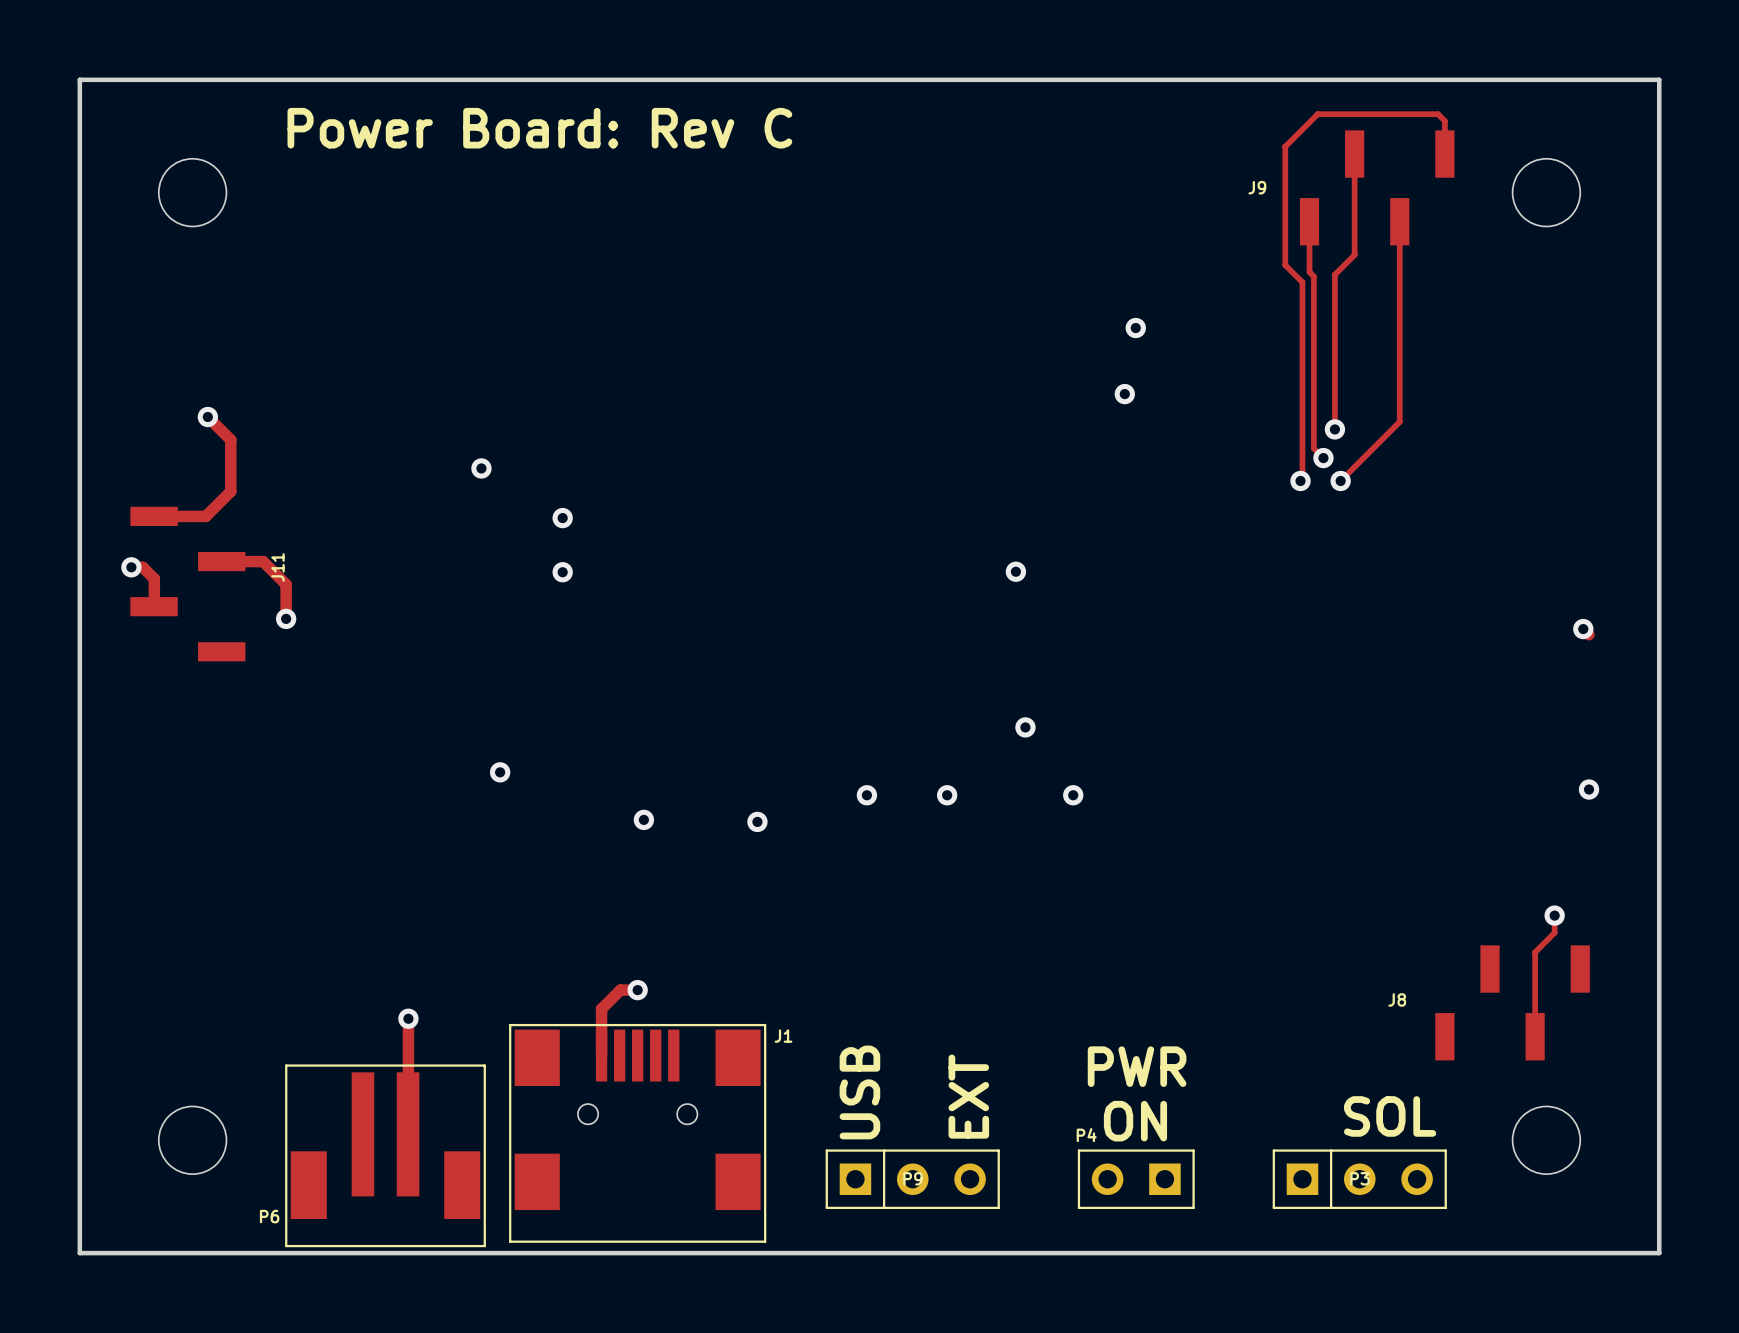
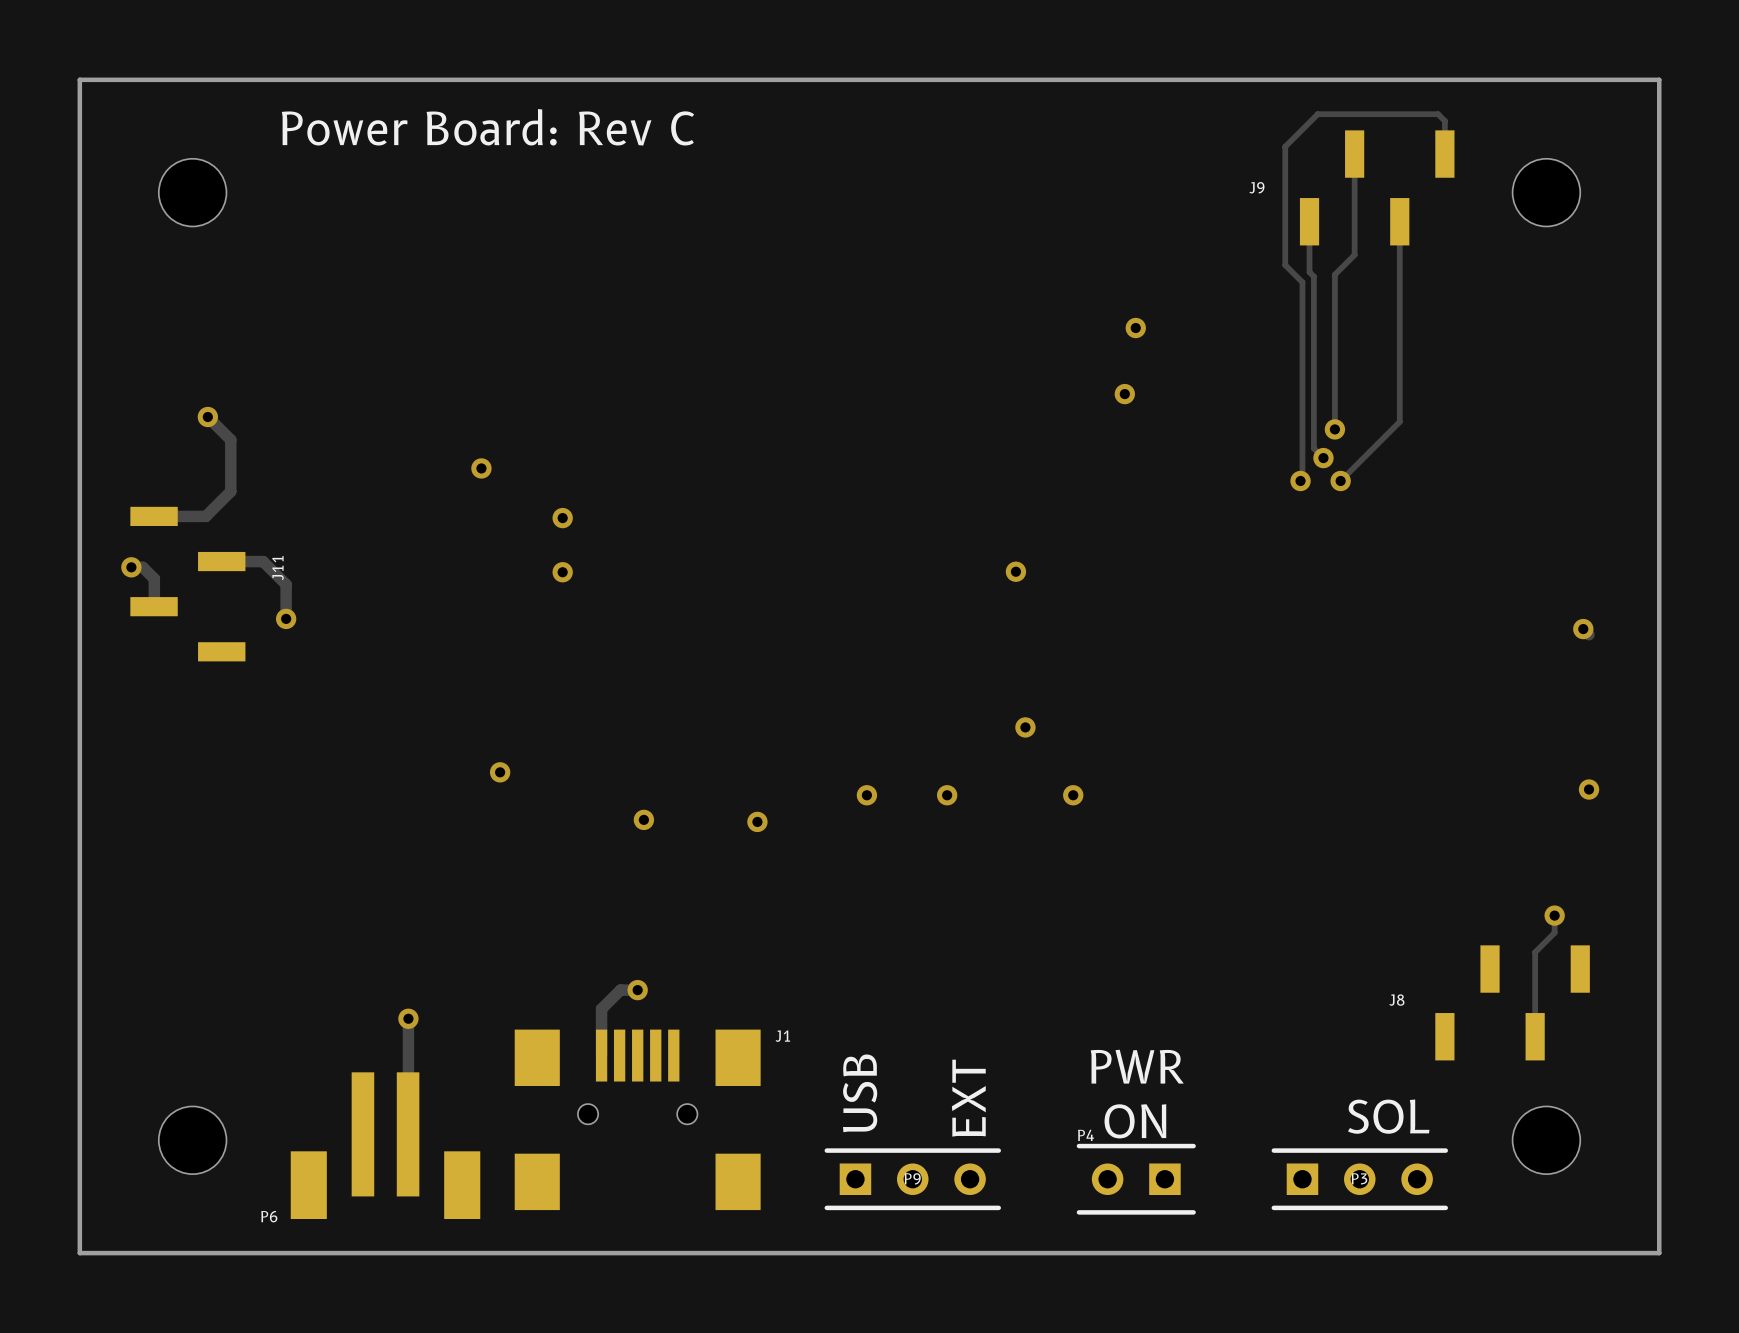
J1 footprint: [509, 1023, 767, 1243] -> [514, 1029, 761, 1211]
P6 footprint: [285, 1064, 486, 1248] -> [290, 1072, 481, 1219]
P9 footprint: [825, 1149, 1000, 1210] -> [824, 1148, 1001, 1211]
P4 footprint: [1077, 1149, 1195, 1210] -> [1076, 1143, 1196, 1215]
P3 footprint: [1272, 1149, 1447, 1210] -> [1271, 1148, 1449, 1211]

